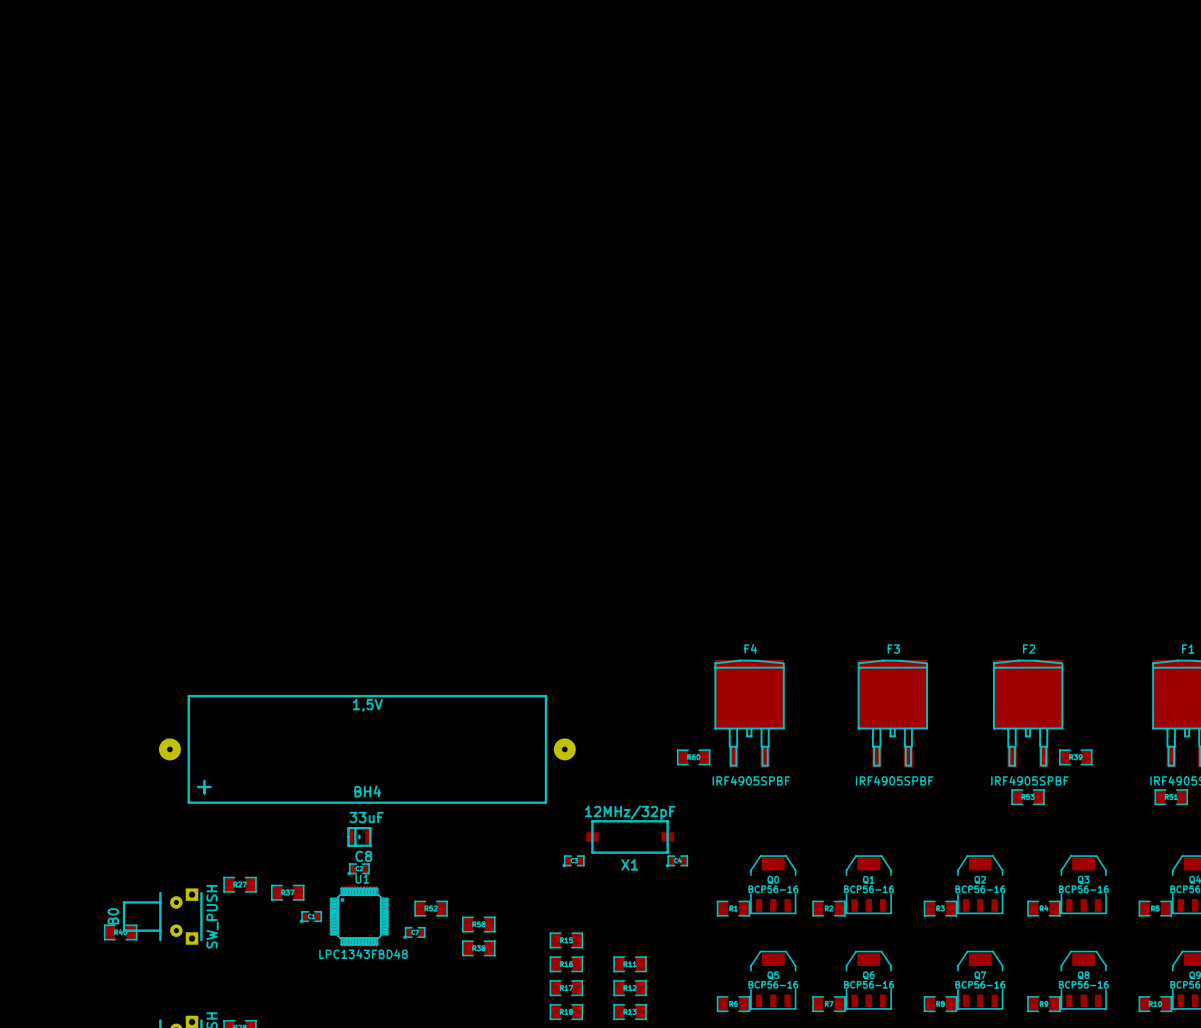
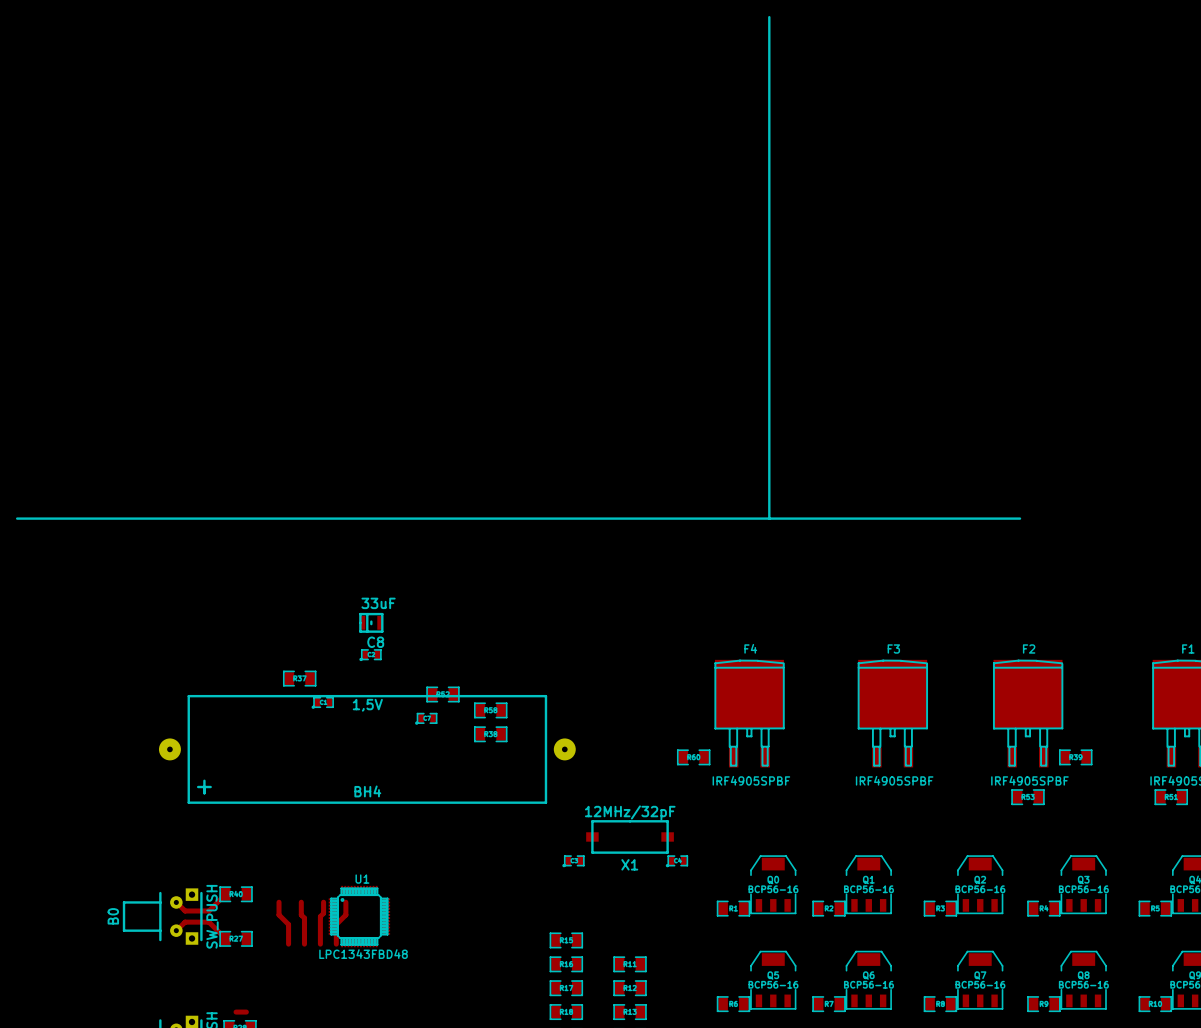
line: none -> (769, 17) (769, 518)
line: none -> (17, 518) (1020, 518)
C8 position: (359, 836) -> (371, 622)
part position: (358, 869) -> (370, 655)
part position: (240, 884) -> (236, 938)
part position: (287, 892) -> (299, 678)
track: none -> (225, 894) (208, 910) (185, 910) (176, 902)
track: none -> (279, 902) (279, 914) (288, 924) (288, 944)
track: none -> (301, 902) (301, 914) (304, 918) (304, 944)
track: none -> (323, 902) (323, 913) (320, 916) (320, 944)
track: none -> (345, 902) (345, 914) (336, 924) (336, 944)
part position: (431, 908) -> (442, 694)
part position: (310, 916) -> (322, 702)
part position: (478, 924) -> (490, 710)
track: none -> (176, 930) (185, 922) (208, 922) (225, 938)
part position: (120, 932) -> (236, 894)
part position: (414, 932) -> (426, 718)
part position: (478, 948) -> (490, 734)
track: none -> (236, 1012) (246, 1012)

